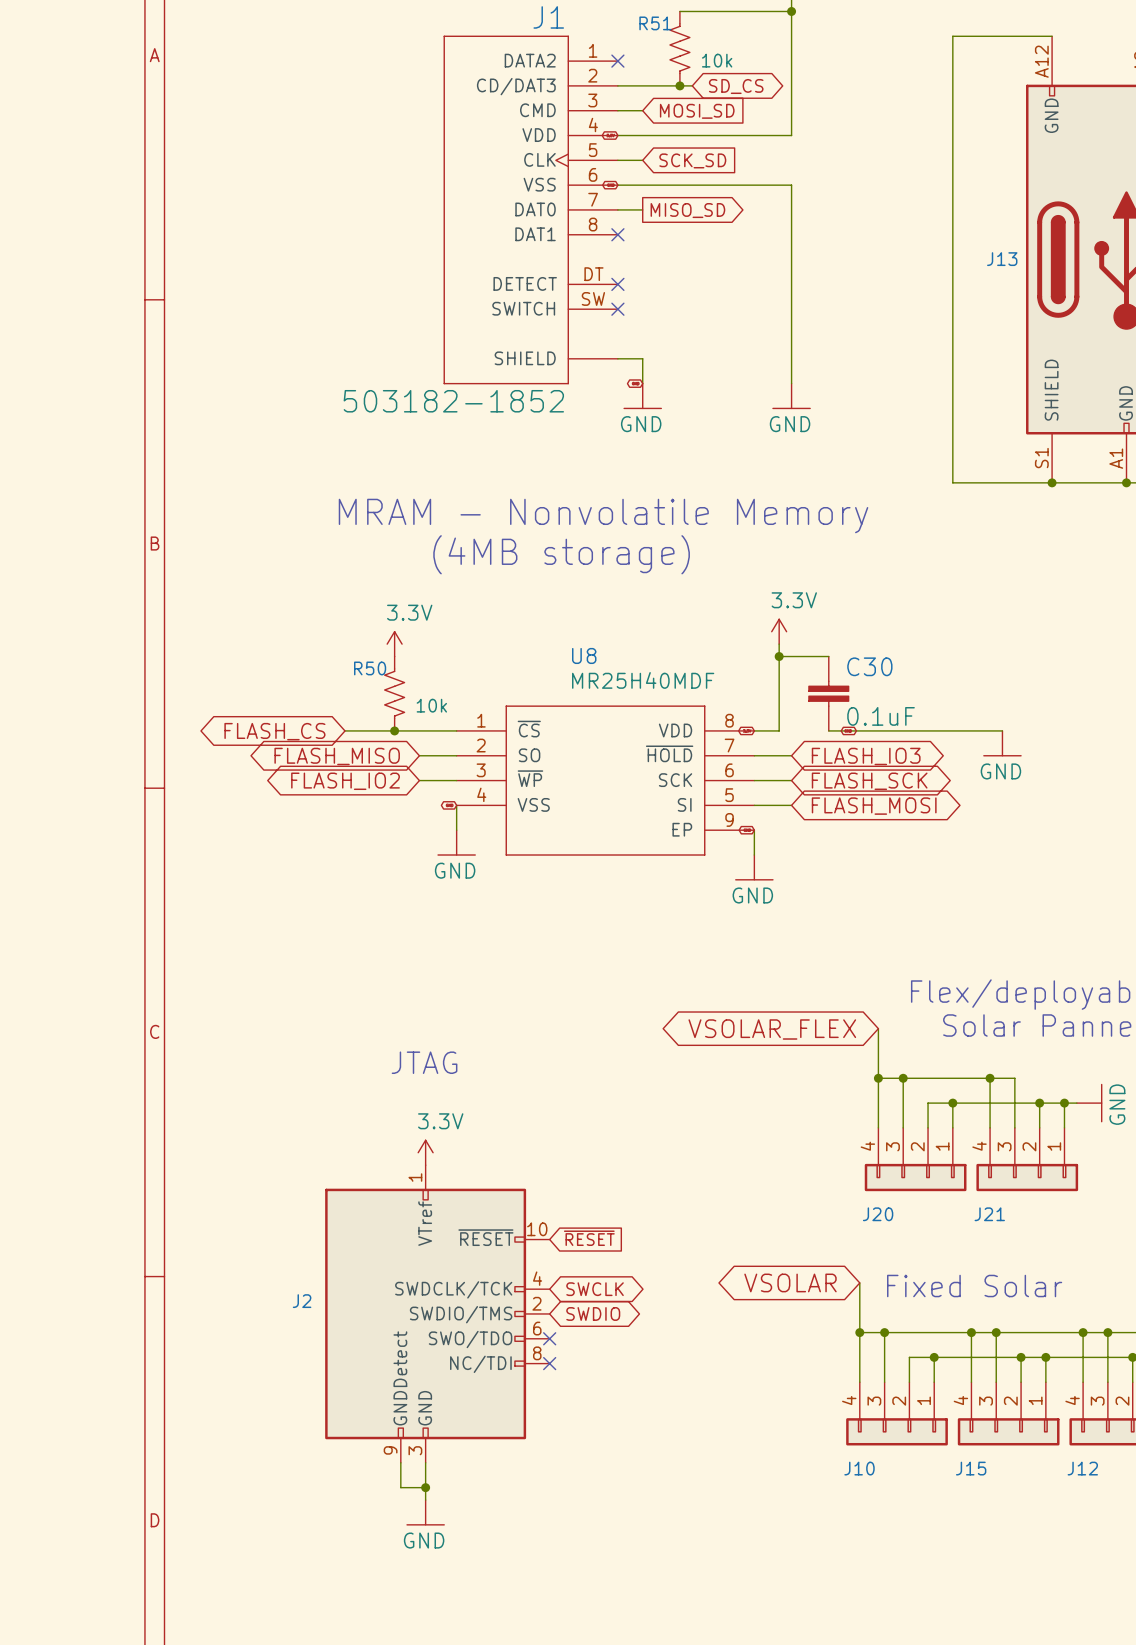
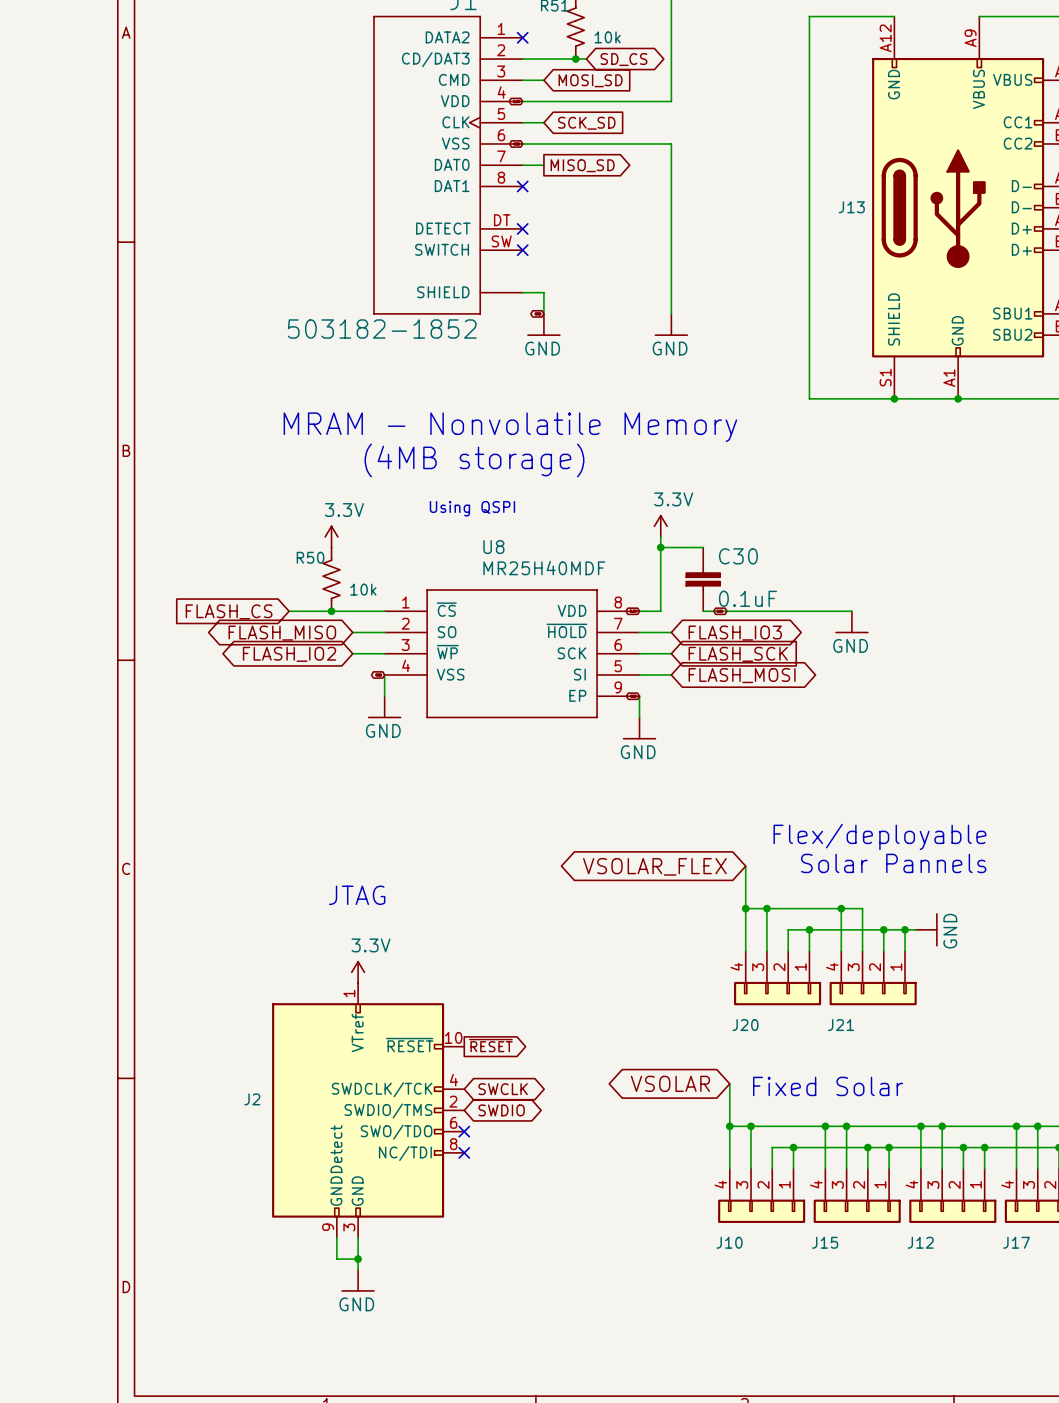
text: none -> Using QSPI (472, 508)
global label shape: bidirectional (274, 731) -> input (229, 611)
global label shape: bidirectional (869, 781) -> input (738, 654)
global label shape: input (589, 1238) -> output (490, 1045)

